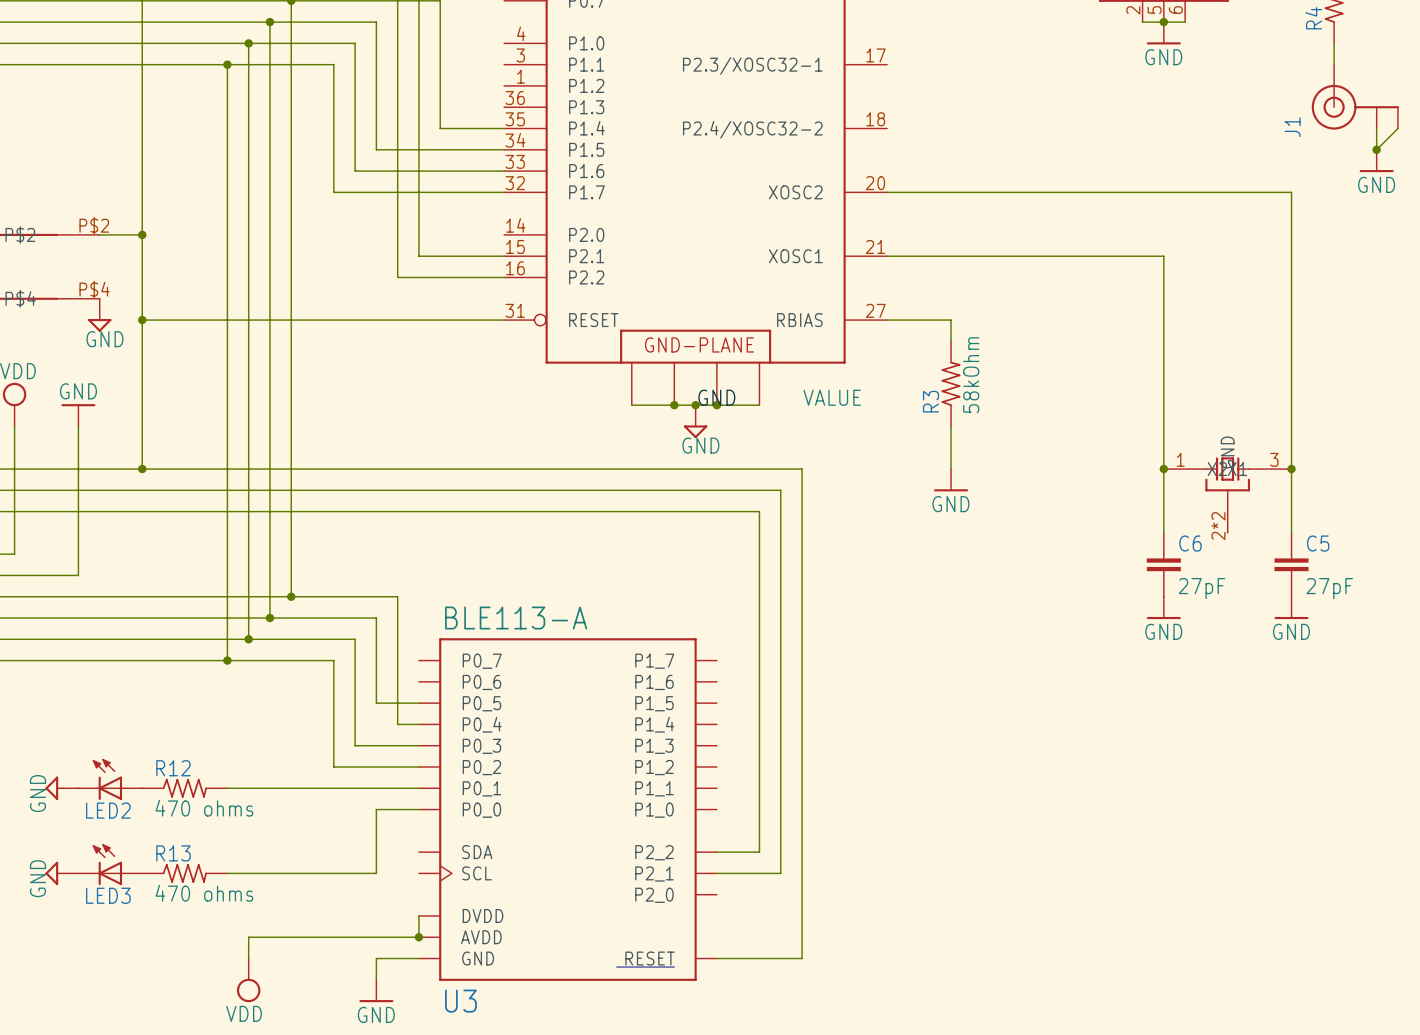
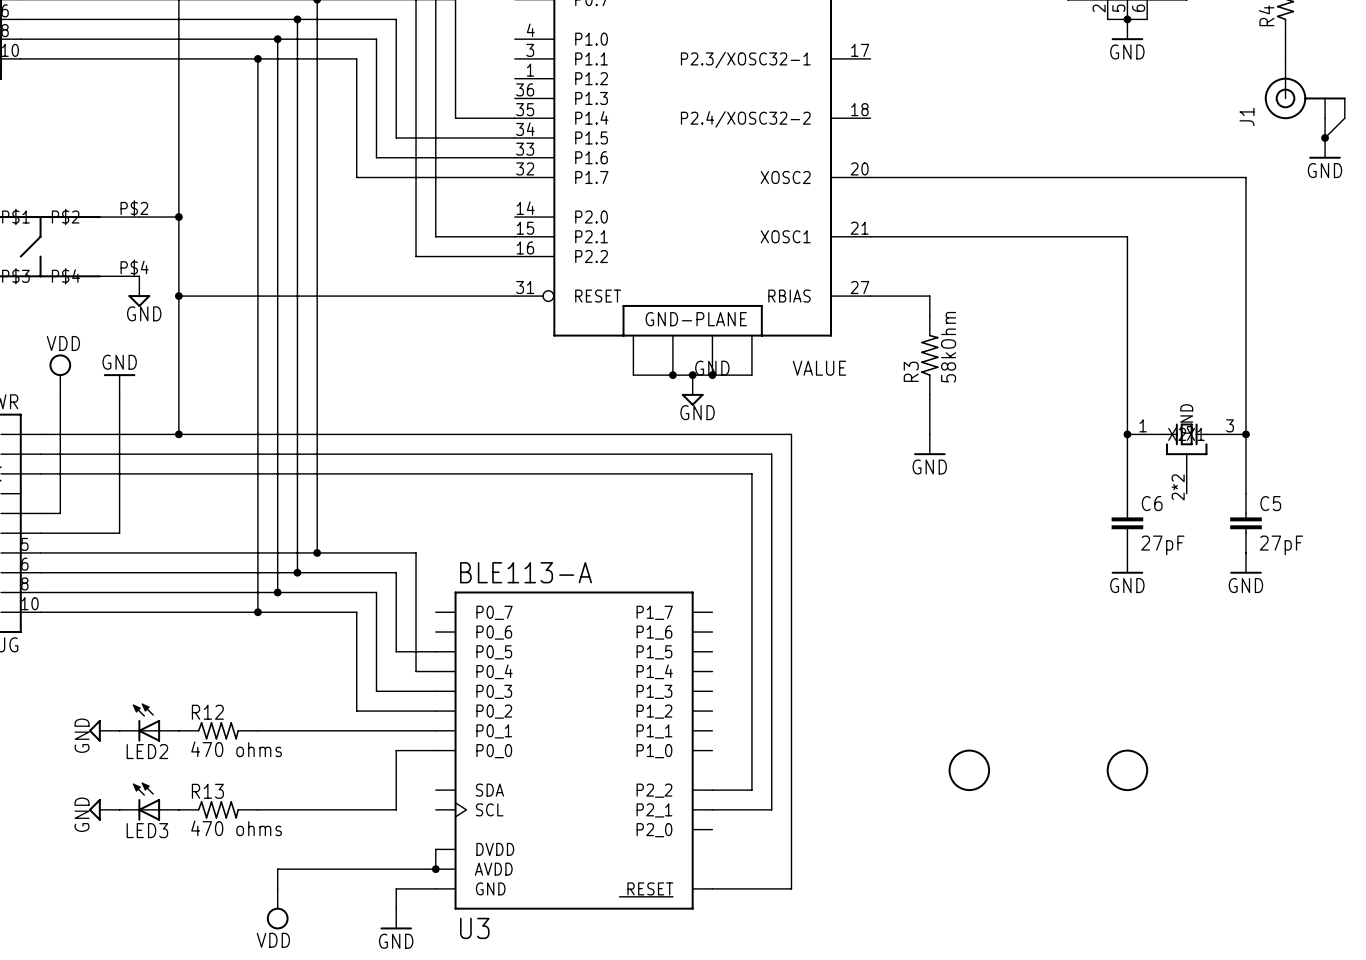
part: none -> (969, 770)
part: none -> (1127, 770)

